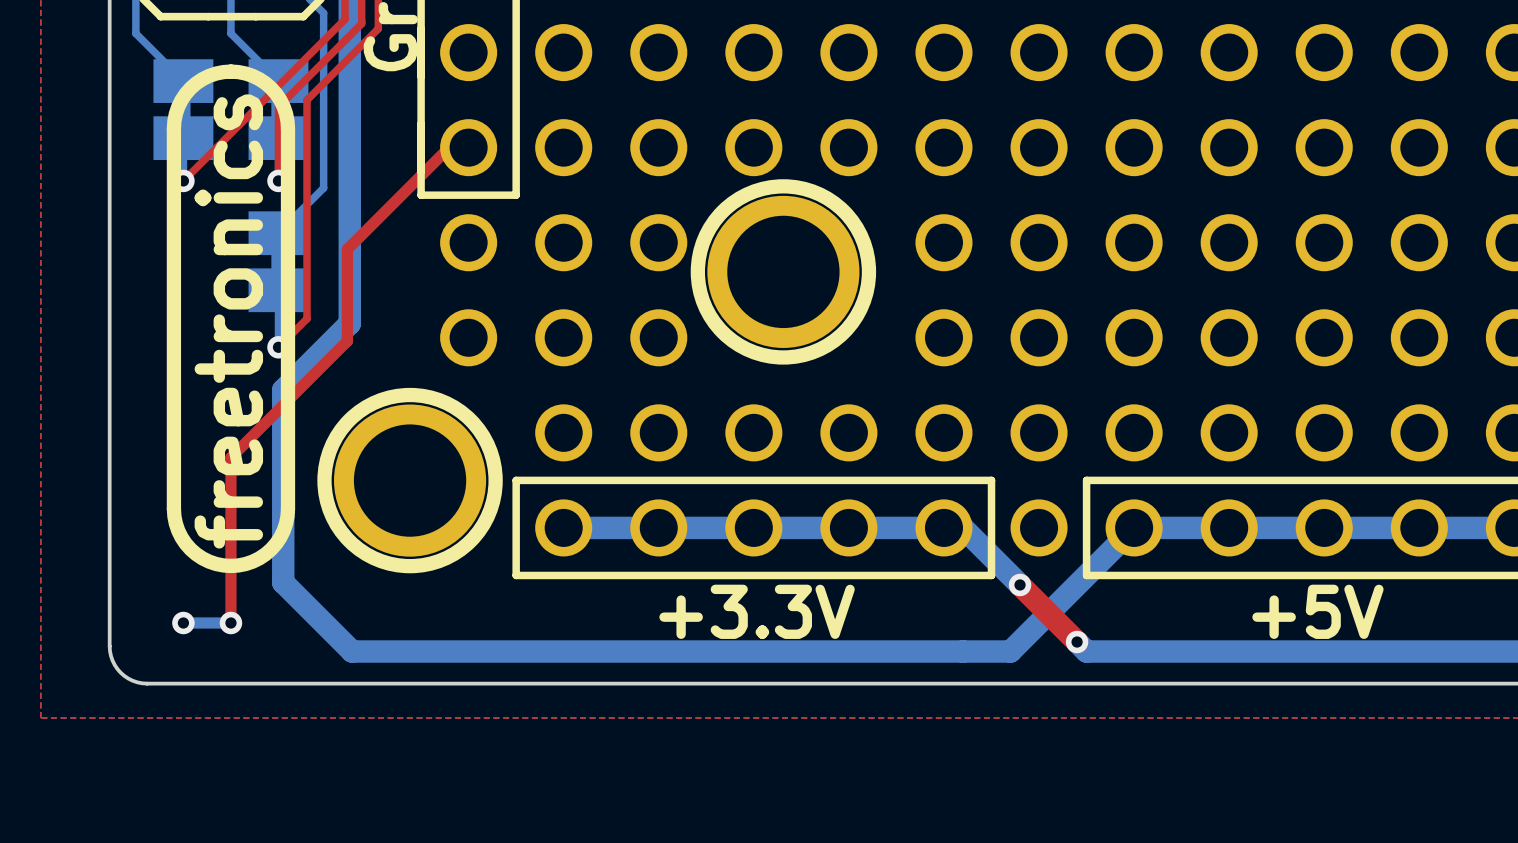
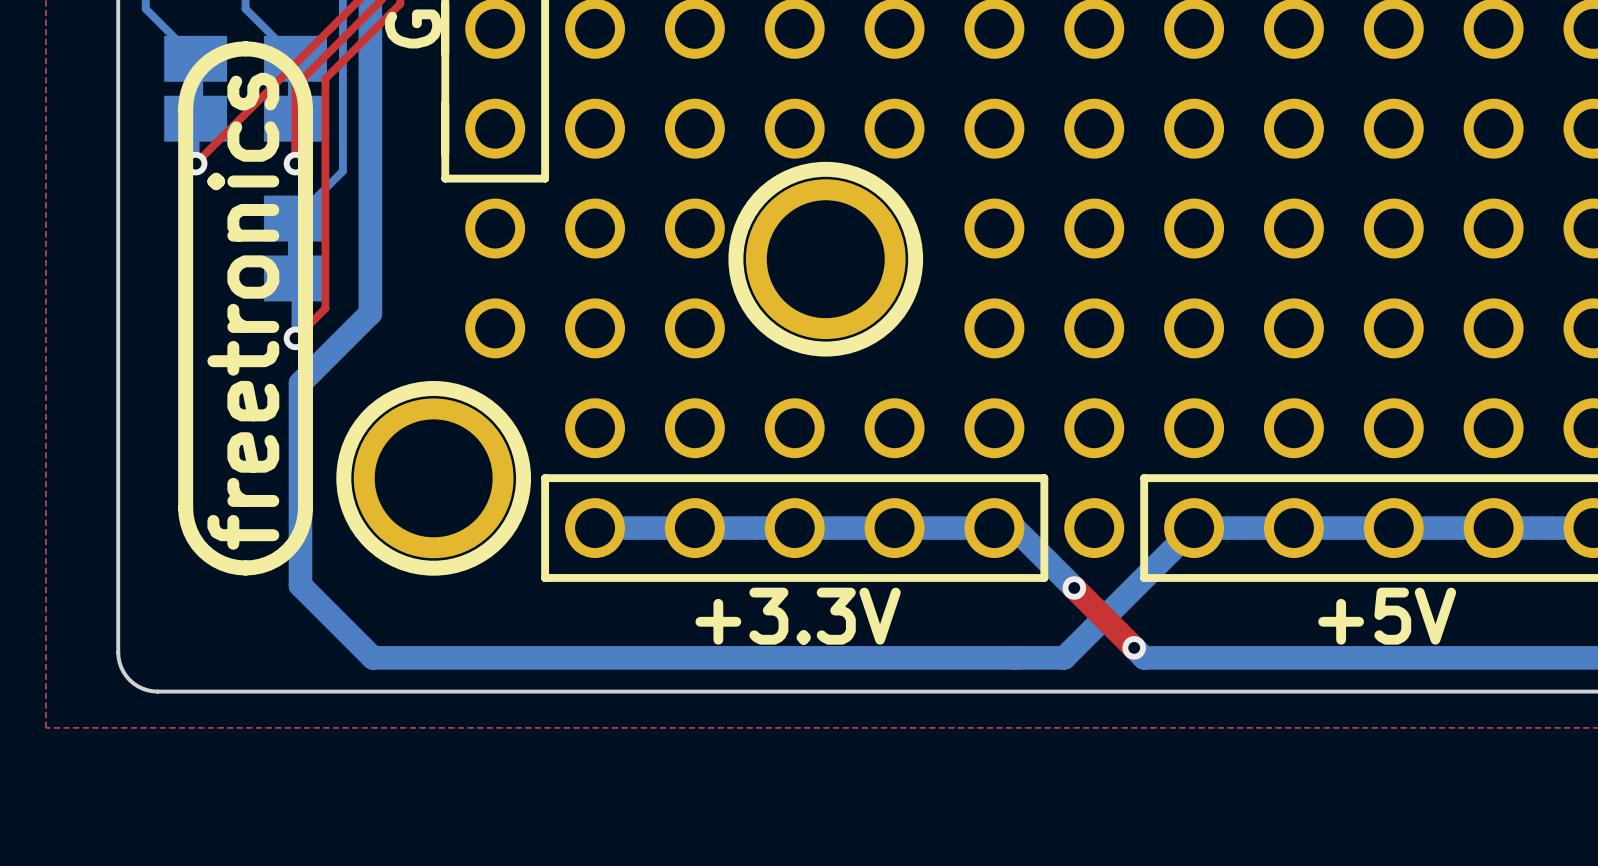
top track: (468, 147) (449, 147) (347, 249) (347, 341) (230, 457) (230, 623) -> none
bottom track: (183, 623) (230, 623) -> none
via: (183, 623) -> none
via: (230, 623) -> none

